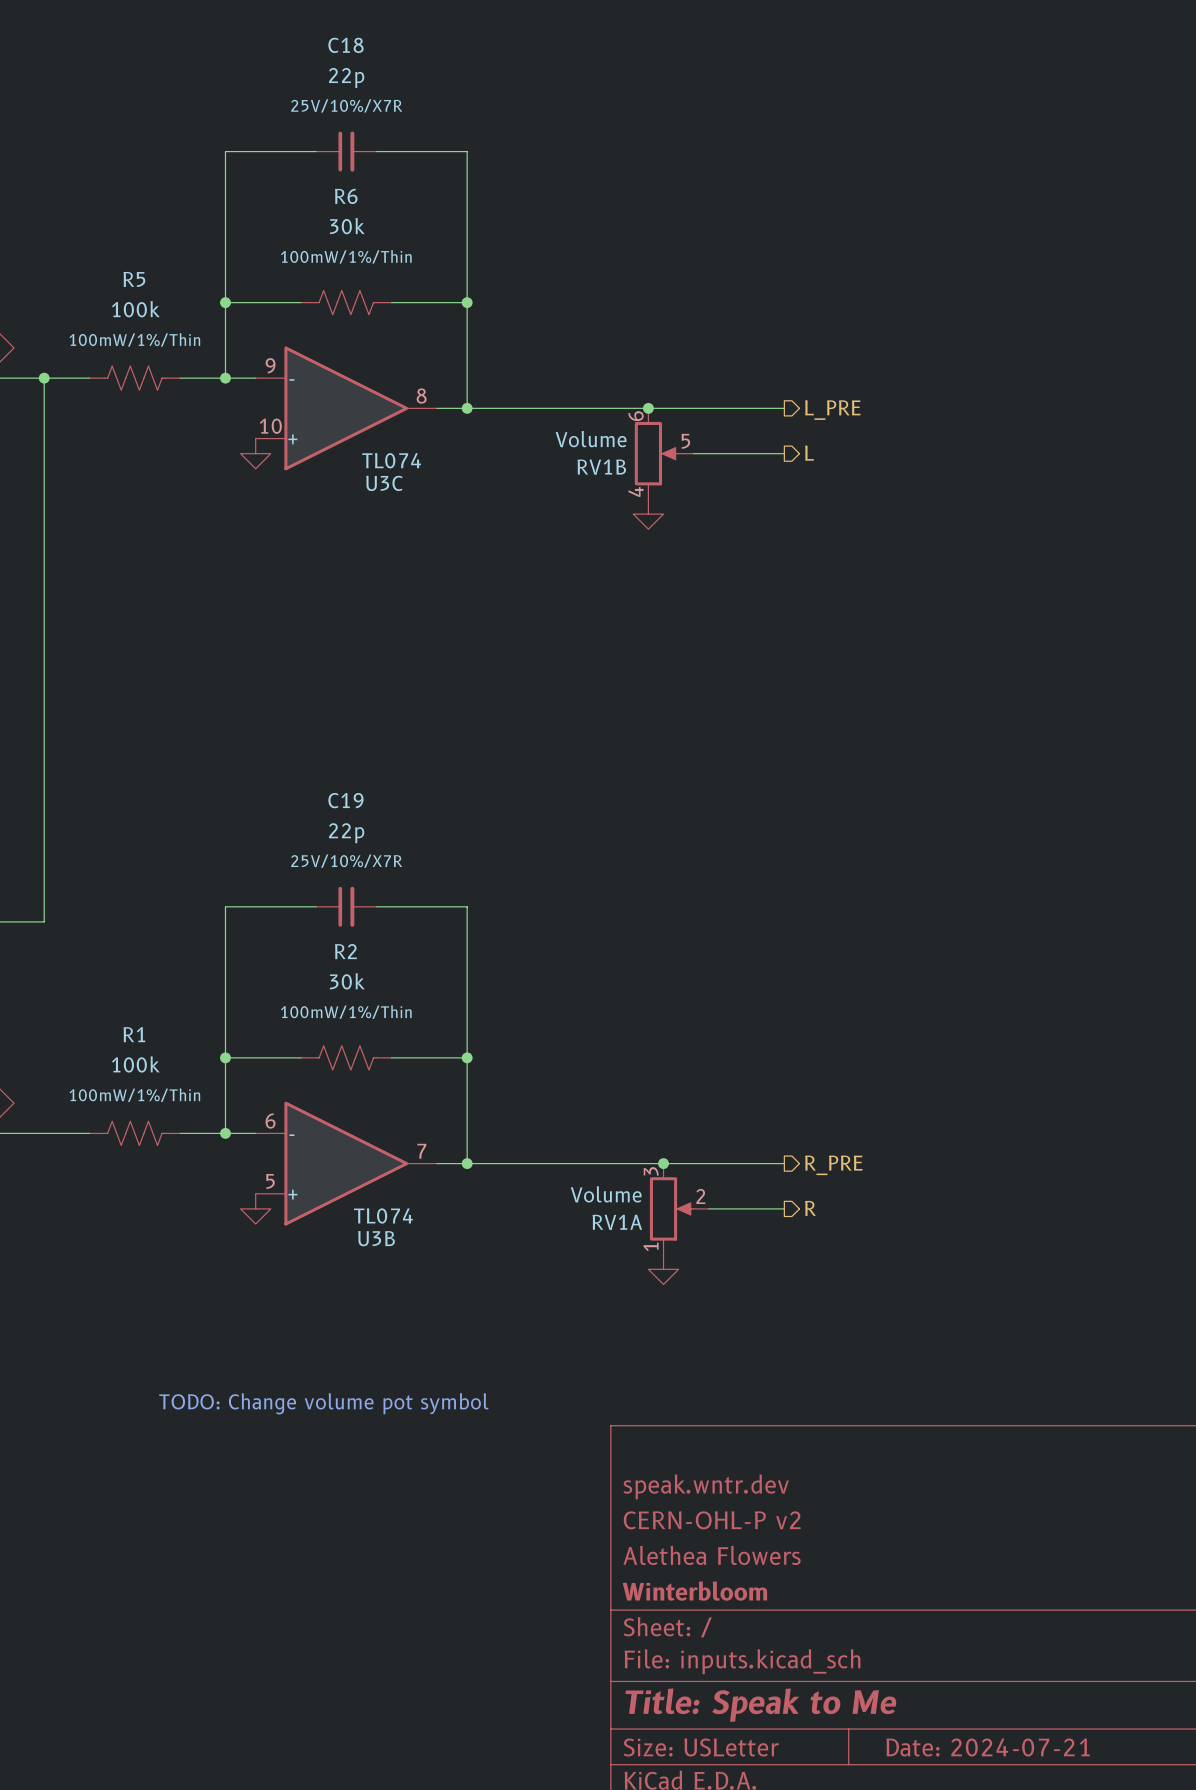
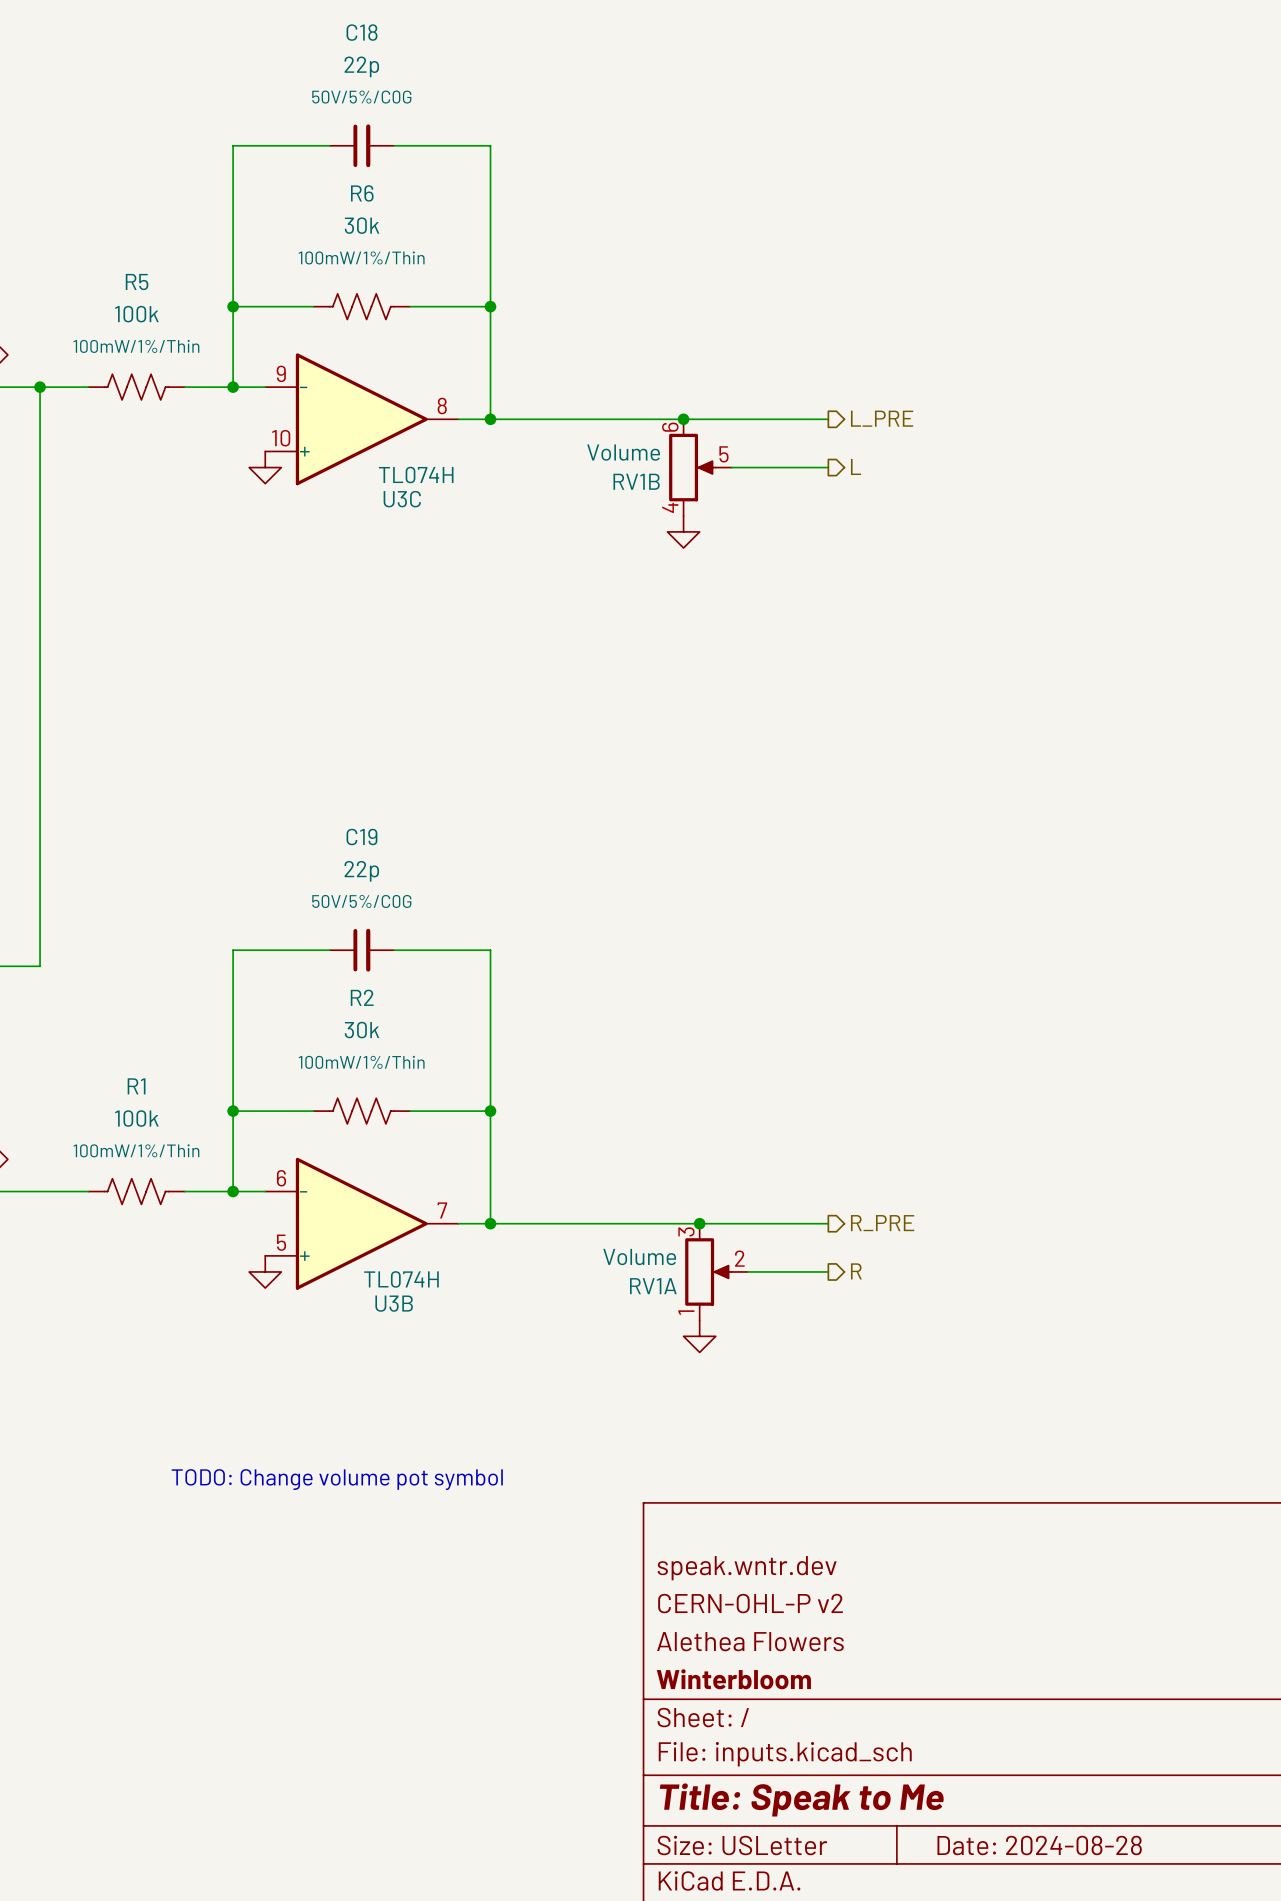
C18 text: 25V/10%/X7R (346, 105) -> 50V/5%/C0G (361, 97)
U3C value: TL074 (391, 460) -> TL074H (416, 475)
C19 text: 25V/10%/X7R (346, 861) -> 50V/5%/C0G (361, 901)
U3B value: TL074 (383, 1215) -> TL074H (401, 1279)
title block: Date: 2024-07-21 (988, 1747) -> Date: 2024-08-28 (1039, 1845)

